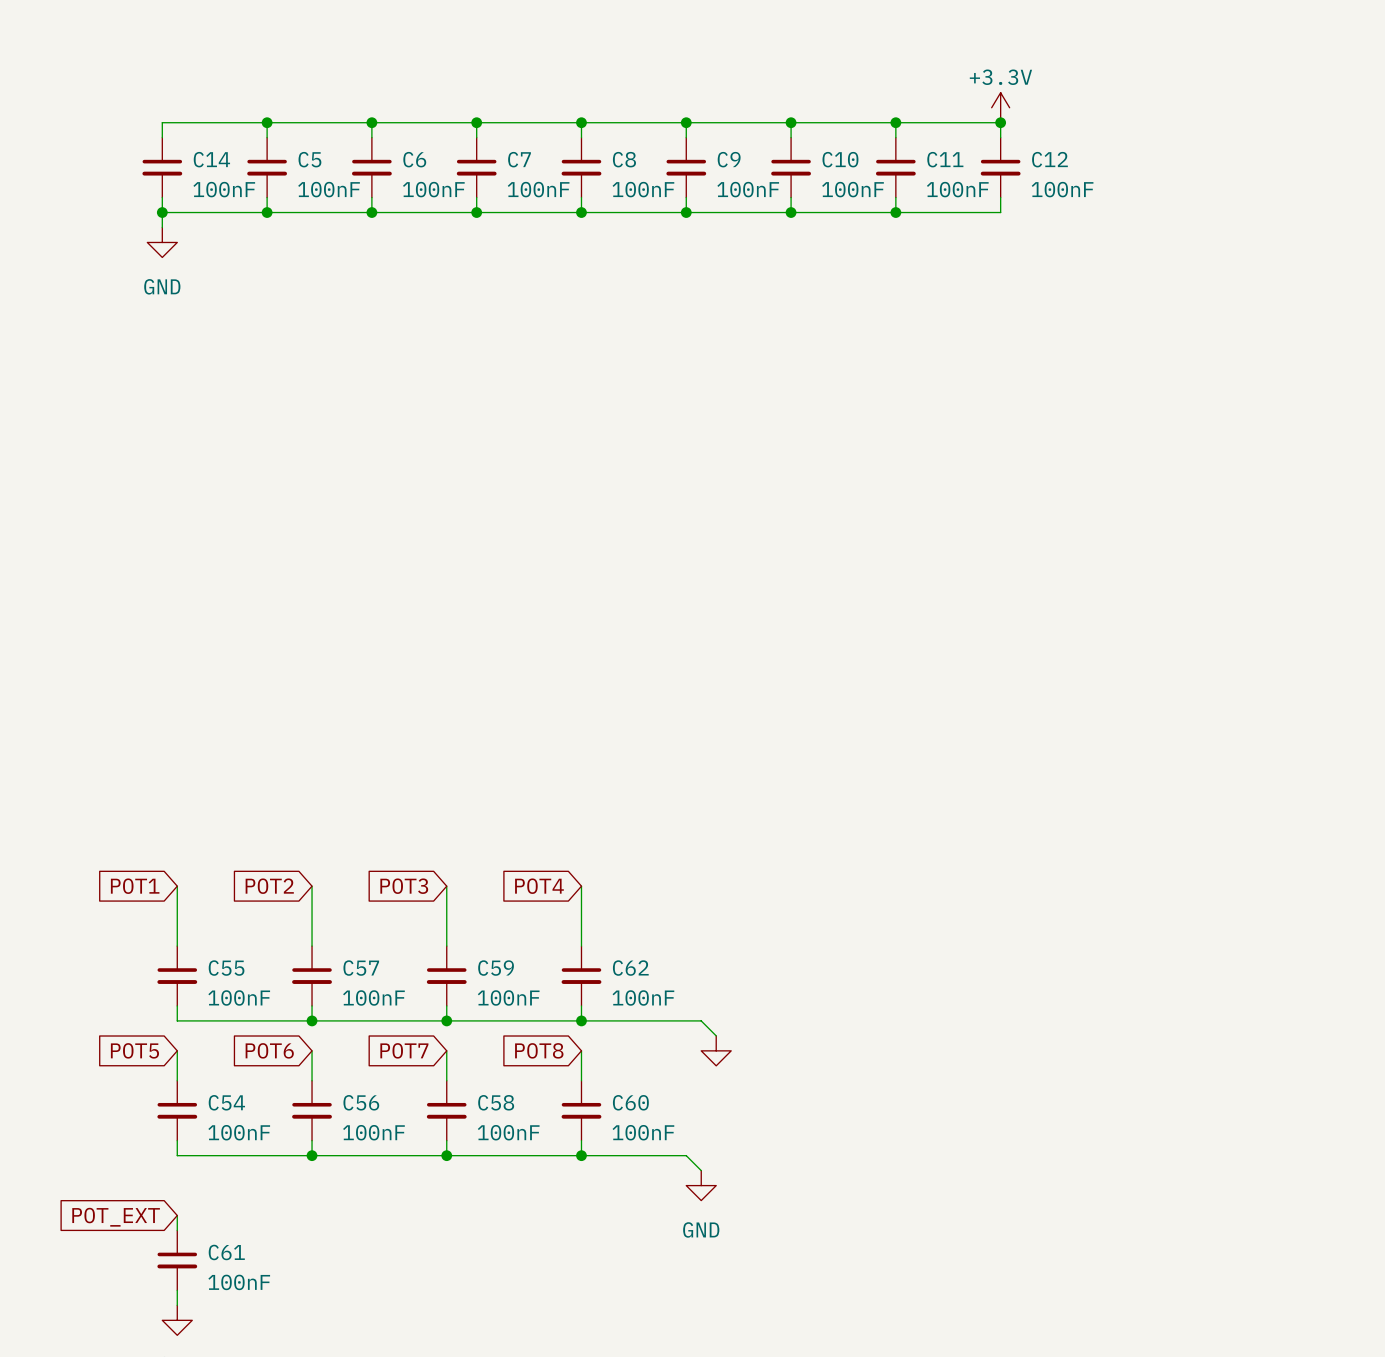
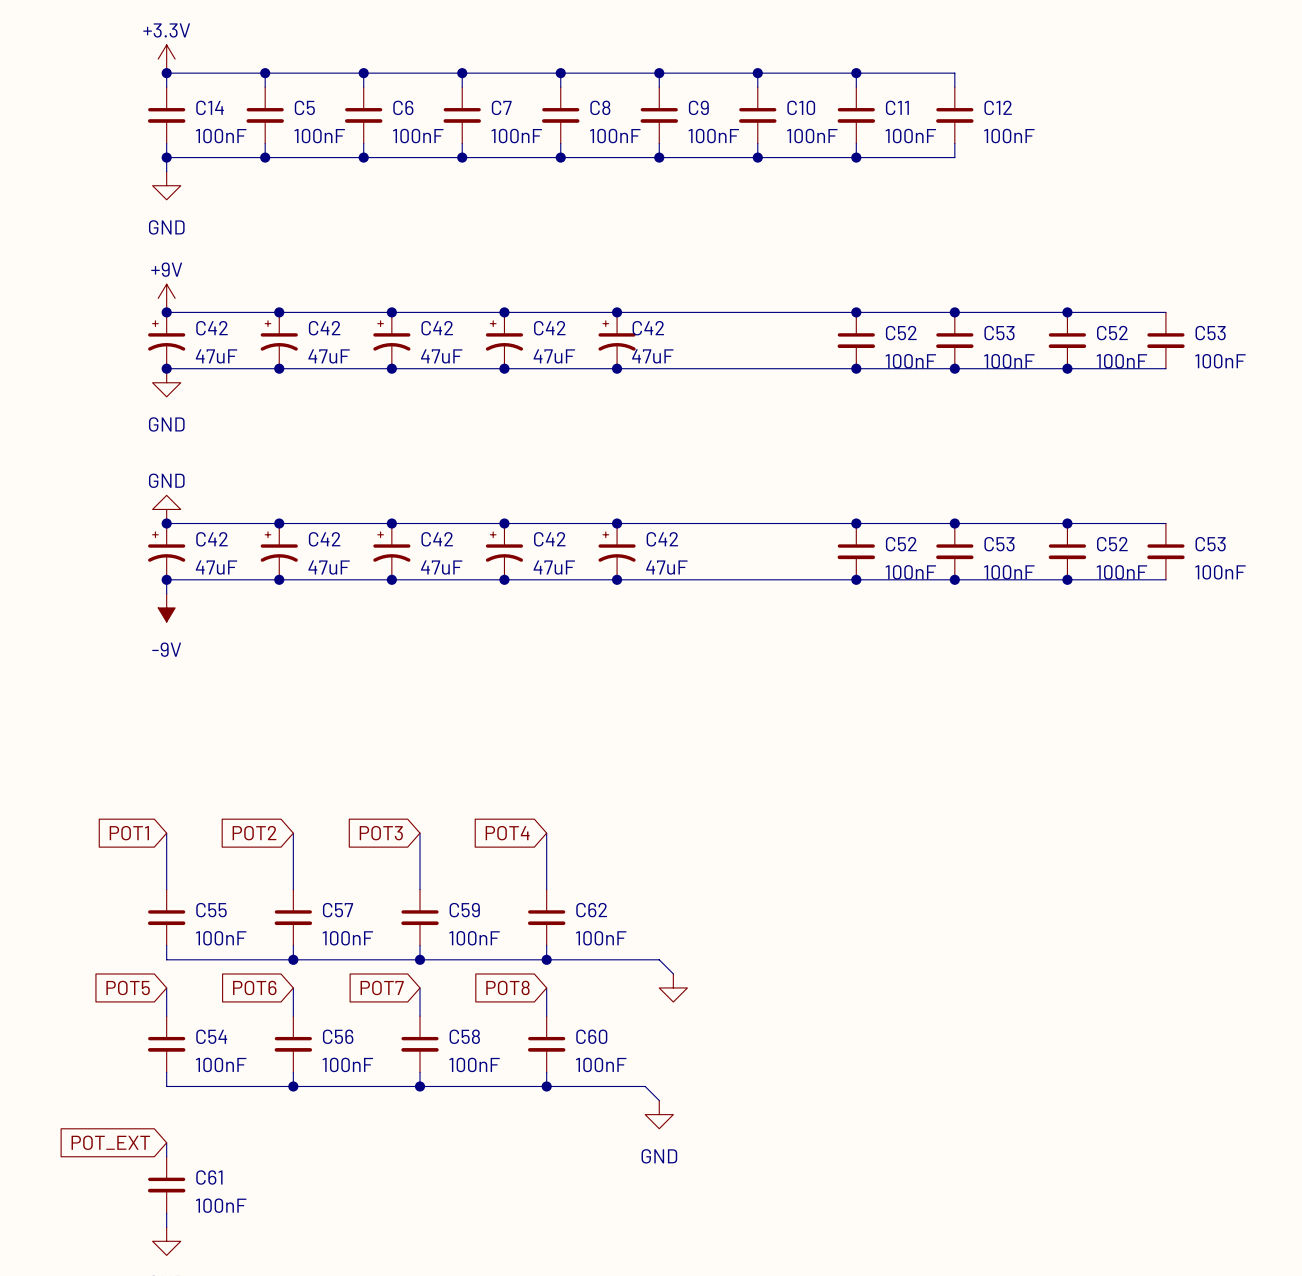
power symbol: none -> +3.3V (166, 59)
junction: none -> (166, 73)
junction: none -> (265, 73)
junction: none -> (363, 73)
junction: none -> (462, 73)
junction: none -> (560, 73)
junction: none -> (659, 73)
junction: none -> (757, 73)
junction: none -> (856, 73)
power symbol: +3.3V (1000, 107) -> none
wire: (267, 122) (267, 137) -> (265, 73) (265, 87)
junction: (267, 122) -> none
wire: (371, 122) (371, 137) -> (363, 73) (363, 87)
junction: (371, 122) -> none
wire: (476, 122) (476, 137) -> (462, 73) (462, 87)
junction: (476, 122) -> none
wire: (581, 122) (581, 137) -> (560, 73) (560, 87)
junction: (581, 122) -> none
wire: (686, 122) (686, 137) -> (659, 73) (659, 87)
junction: (686, 122) -> none
wire: (791, 122) (791, 137) -> (757, 73) (757, 87)
junction: (791, 122) -> none
wire: (895, 122) (895, 137) -> (856, 73) (856, 87)
junction: (895, 122) -> none
junction: (1000, 122) -> none
wire: (162, 137) (162, 122) (1000, 122) (1000, 137) -> (166, 87) (166, 73) (954, 73) (954, 87)
C14 position: (162, 167) -> (166, 115)
C5 position: (267, 167) -> (265, 115)
junction: none -> (265, 157)
C6 position: (371, 167) -> (363, 115)
junction: none -> (363, 157)
C7 position: (476, 167) -> (462, 115)
junction: none -> (462, 157)
C8 position: (581, 167) -> (560, 115)
junction: none -> (560, 157)
C9 position: (686, 167) -> (659, 115)
junction: none -> (659, 157)
C10 position: (791, 167) -> (757, 115)
junction: none -> (757, 157)
C11 position: (895, 167) -> (856, 115)
junction: none -> (856, 157)
C12 position: (1000, 167) -> (954, 115)
wire: (162, 197) (162, 227) -> (166, 143) (166, 171)
wire: (267, 197) (267, 212) -> (265, 143) (265, 157)
wire: (371, 197) (371, 212) -> (363, 143) (363, 157)
wire: (476, 197) (476, 212) -> (462, 143) (462, 157)
wire: (581, 197) (581, 212) -> (560, 143) (560, 157)
wire: (686, 197) (686, 212) -> (659, 143) (659, 157)
wire: (791, 197) (791, 212) -> (757, 143) (757, 157)
wire: (895, 197) (895, 212) -> (856, 143) (856, 157)
wire: (1000, 197) (1000, 212) (162, 212) -> (954, 143) (954, 157) (166, 157)
junction position: (162, 212) -> (166, 157)
junction: (267, 212) -> none
junction: (371, 212) -> none
junction: (476, 212) -> none
junction: (581, 212) -> none
junction: (686, 212) -> none
junction: (791, 212) -> none
junction: (895, 212) -> none
power symbol position: GND (162, 242) -> GND (166, 185)
power symbol: none -> +9V (166, 298)
wire: none -> (166, 312) (1165, 312)
junction: none -> (166, 312)
junction: none -> (279, 312)
junction: none -> (391, 312)
junction: none -> (504, 312)
junction: none -> (617, 312)
junction: none -> (856, 312)
junction: none -> (954, 312)
junction: none -> (1067, 312)
C42: none -> 47uF (166, 340)
C42: none -> 47uF (279, 340)
C42: none -> 47uF (391, 340)
C42: none -> 47uF (504, 340)
C42: none -> 47uF (617, 340)
C52: none -> 100nF (856, 340)
C53: none -> 100nF (954, 340)
C52: none -> 100nF (1067, 340)
C53: none -> 100nF (1165, 340)
wire: none -> (166, 368) (1165, 368)
junction: none -> (166, 368)
junction: none -> (279, 368)
junction: none -> (391, 368)
junction: none -> (504, 368)
junction: none -> (617, 368)
junction: none -> (856, 368)
junction: none -> (954, 368)
junction: none -> (1067, 368)
power symbol: none -> GND (166, 382)
power symbol: none -> GND (166, 509)
wire: none -> (166, 523) (1165, 523)
junction: none -> (166, 523)
junction: none -> (279, 523)
junction: none -> (391, 523)
junction: none -> (504, 523)
junction: none -> (617, 523)
junction: none -> (856, 523)
junction: none -> (954, 523)
junction: none -> (1067, 523)
C42: none -> 47uF (166, 551)
C42: none -> 47uF (279, 551)
C42: none -> 47uF (391, 551)
C42: none -> 47uF (504, 551)
C42: none -> 47uF (617, 551)
C52: none -> 100nF (856, 551)
C53: none -> 100nF (954, 551)
C52: none -> 100nF (1067, 551)
C53: none -> 100nF (1165, 551)
junction: none -> (166, 579)
junction: none -> (279, 579)
junction: none -> (391, 579)
junction: none -> (504, 579)
junction: none -> (617, 579)
junction: none -> (856, 579)
junction: none -> (954, 579)
junction: none -> (1067, 579)
wire: none -> (1165, 579) (166, 579) (166, 593)
power symbol: none -> -9V (166, 607)

